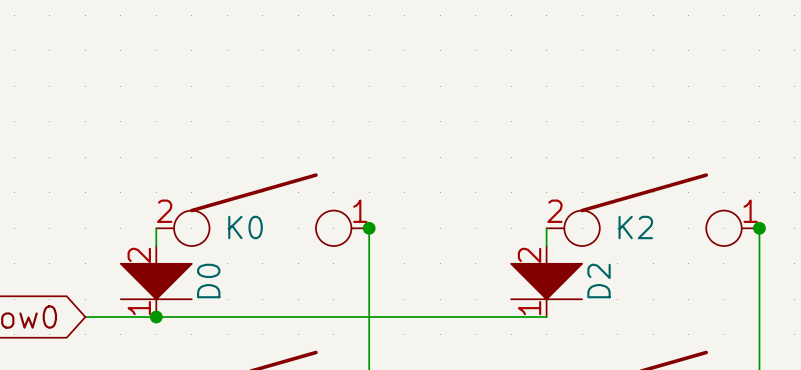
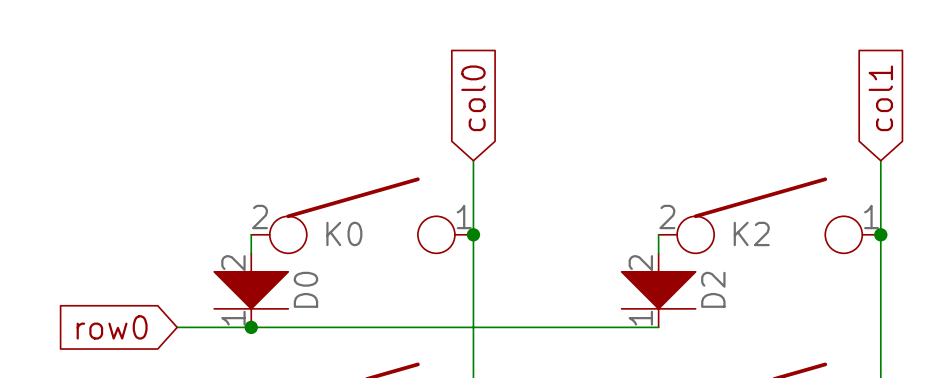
global label: none -> col0 (473, 98)
global label: none -> col1 (880, 98)
wire: none -> (473, 160) (473, 234)
wire: none -> (880, 160) (880, 234)

